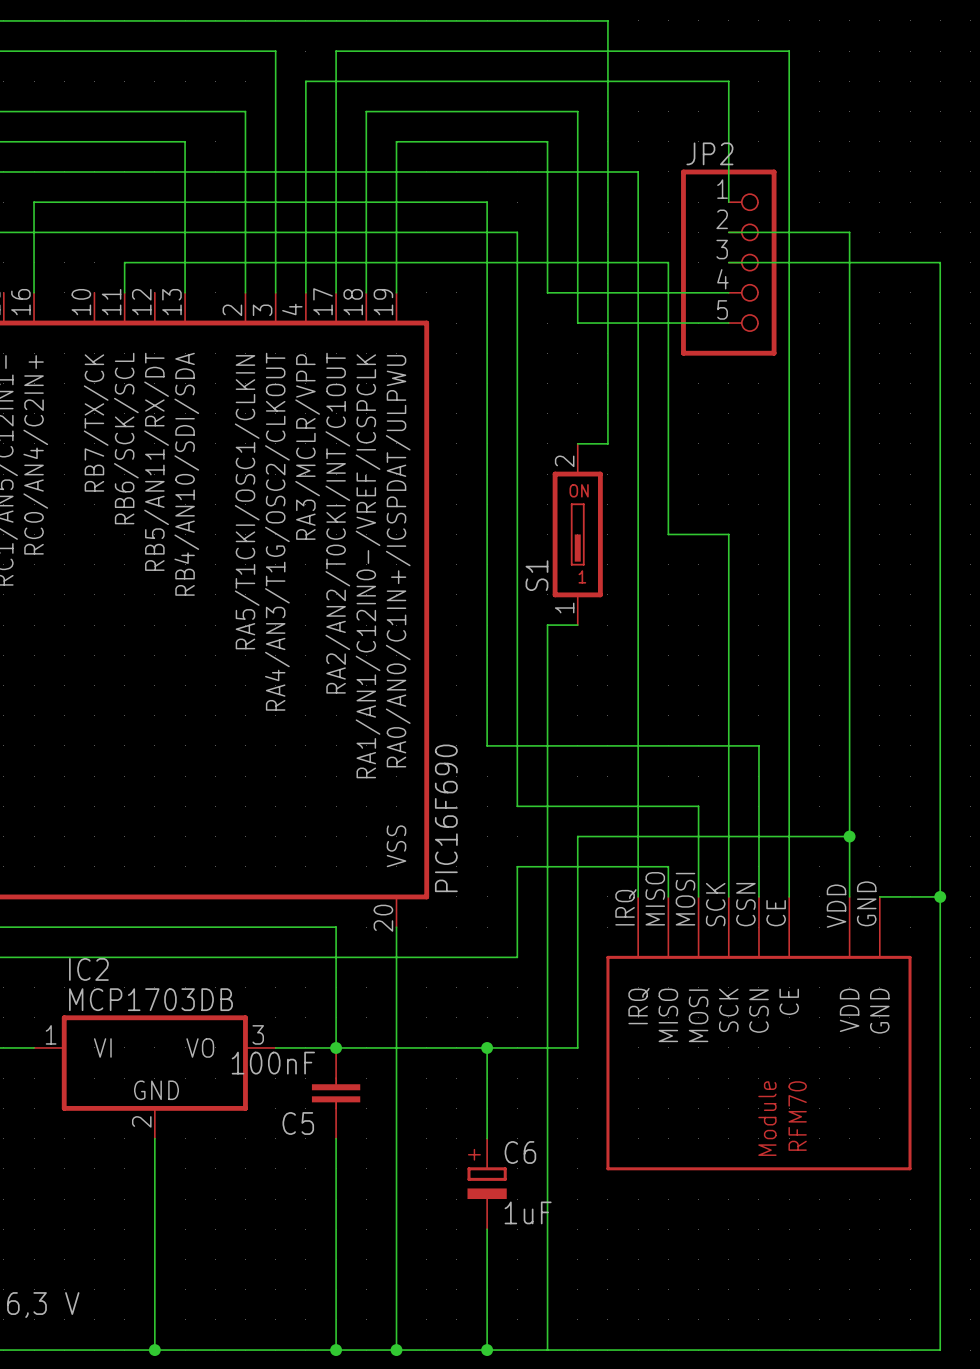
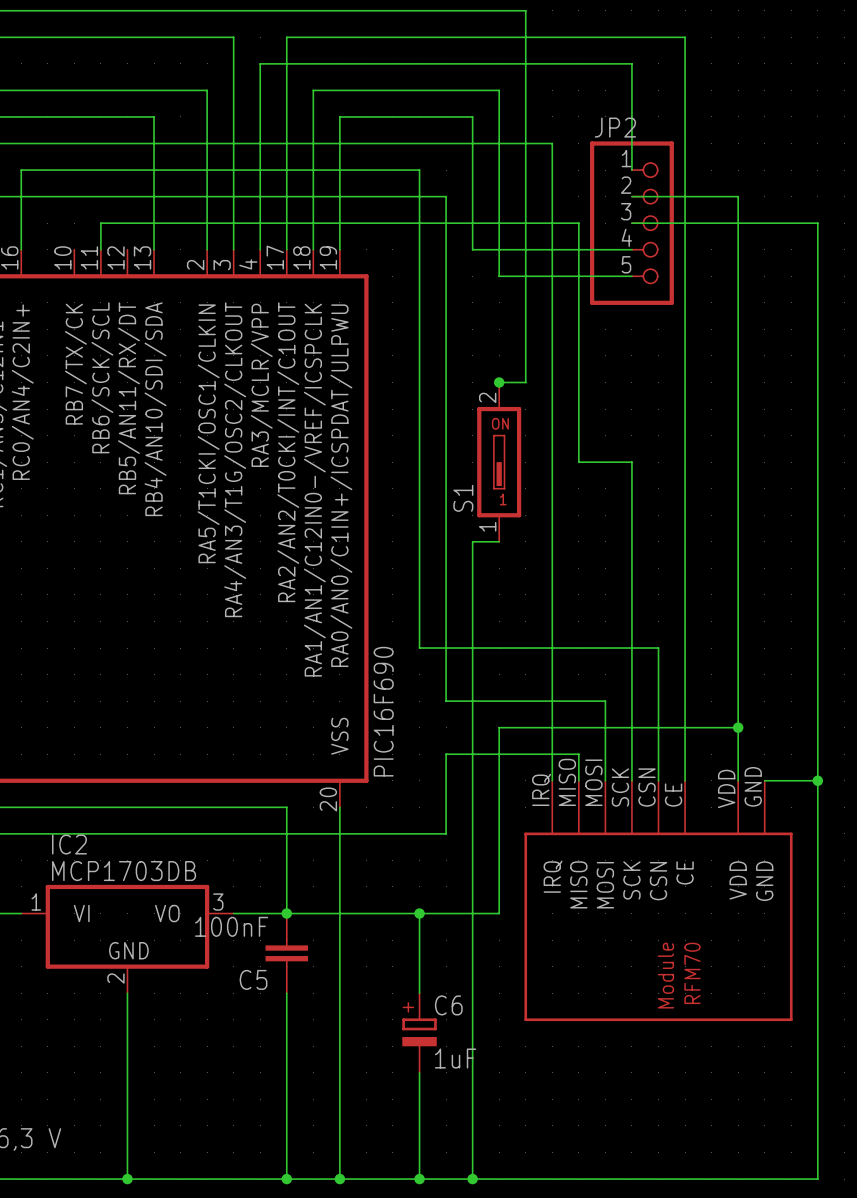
junction: none -> (499, 382)
junction: none -> (472, 1179)

